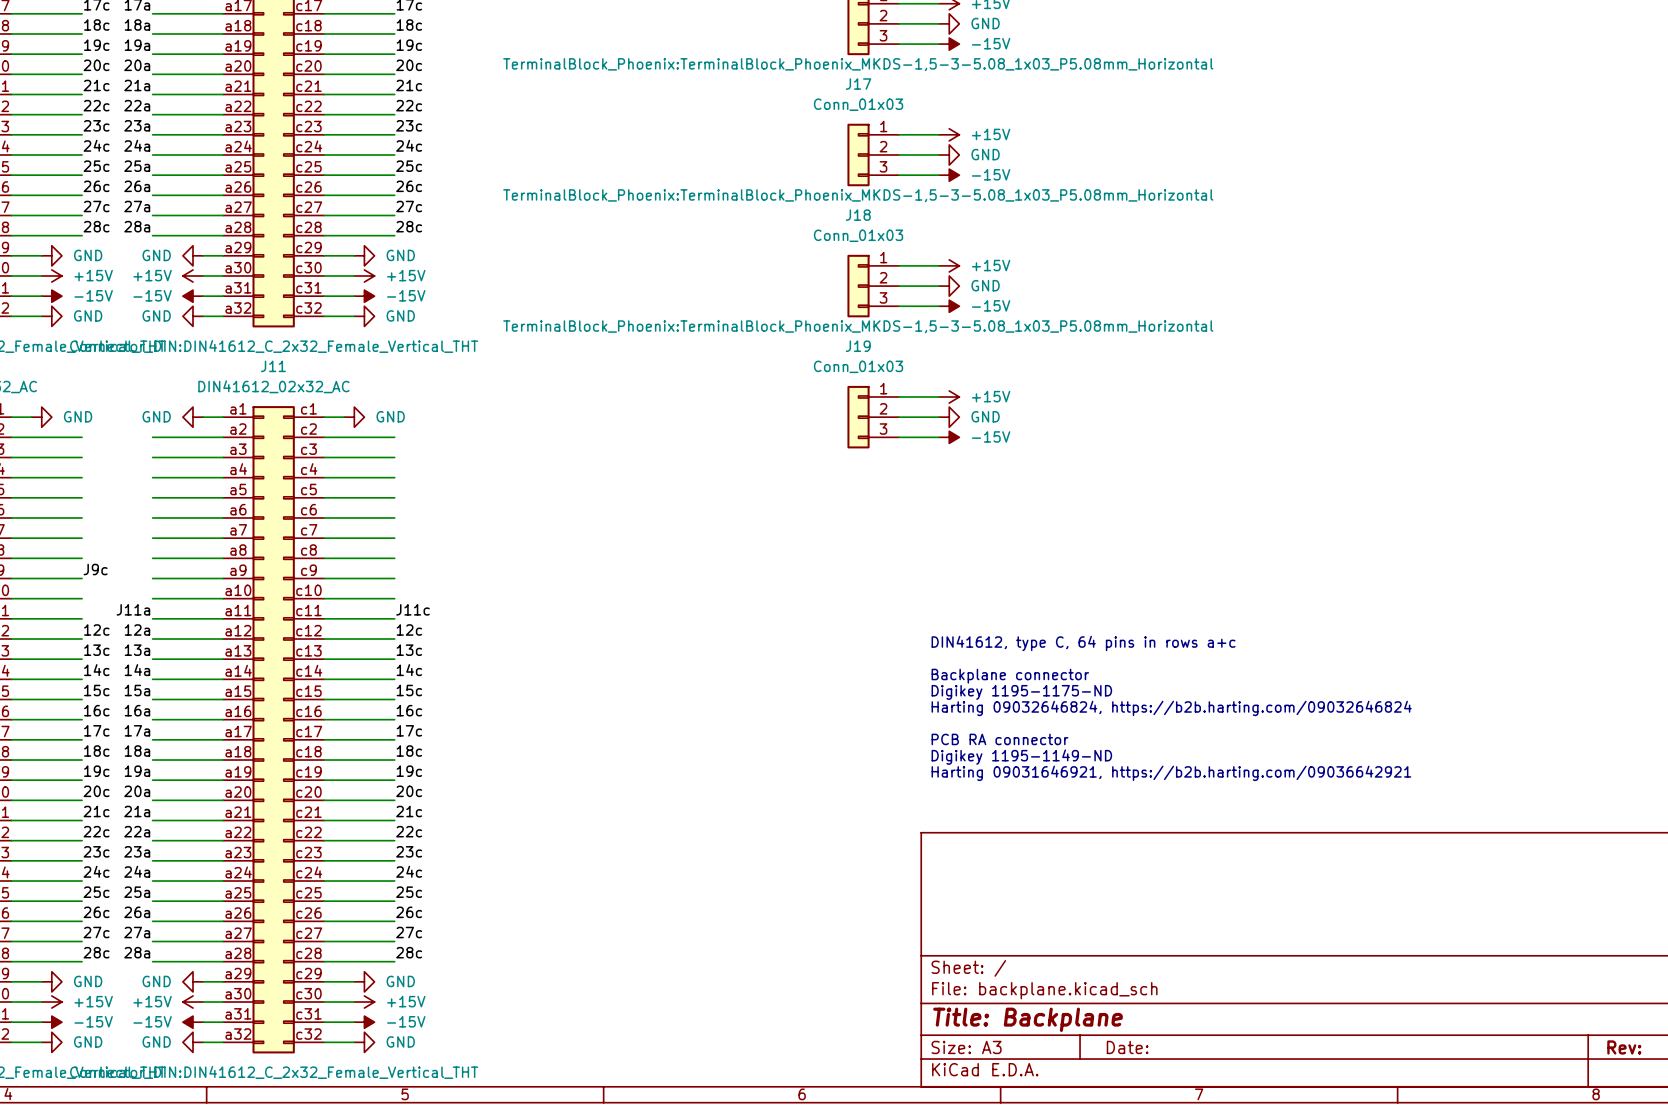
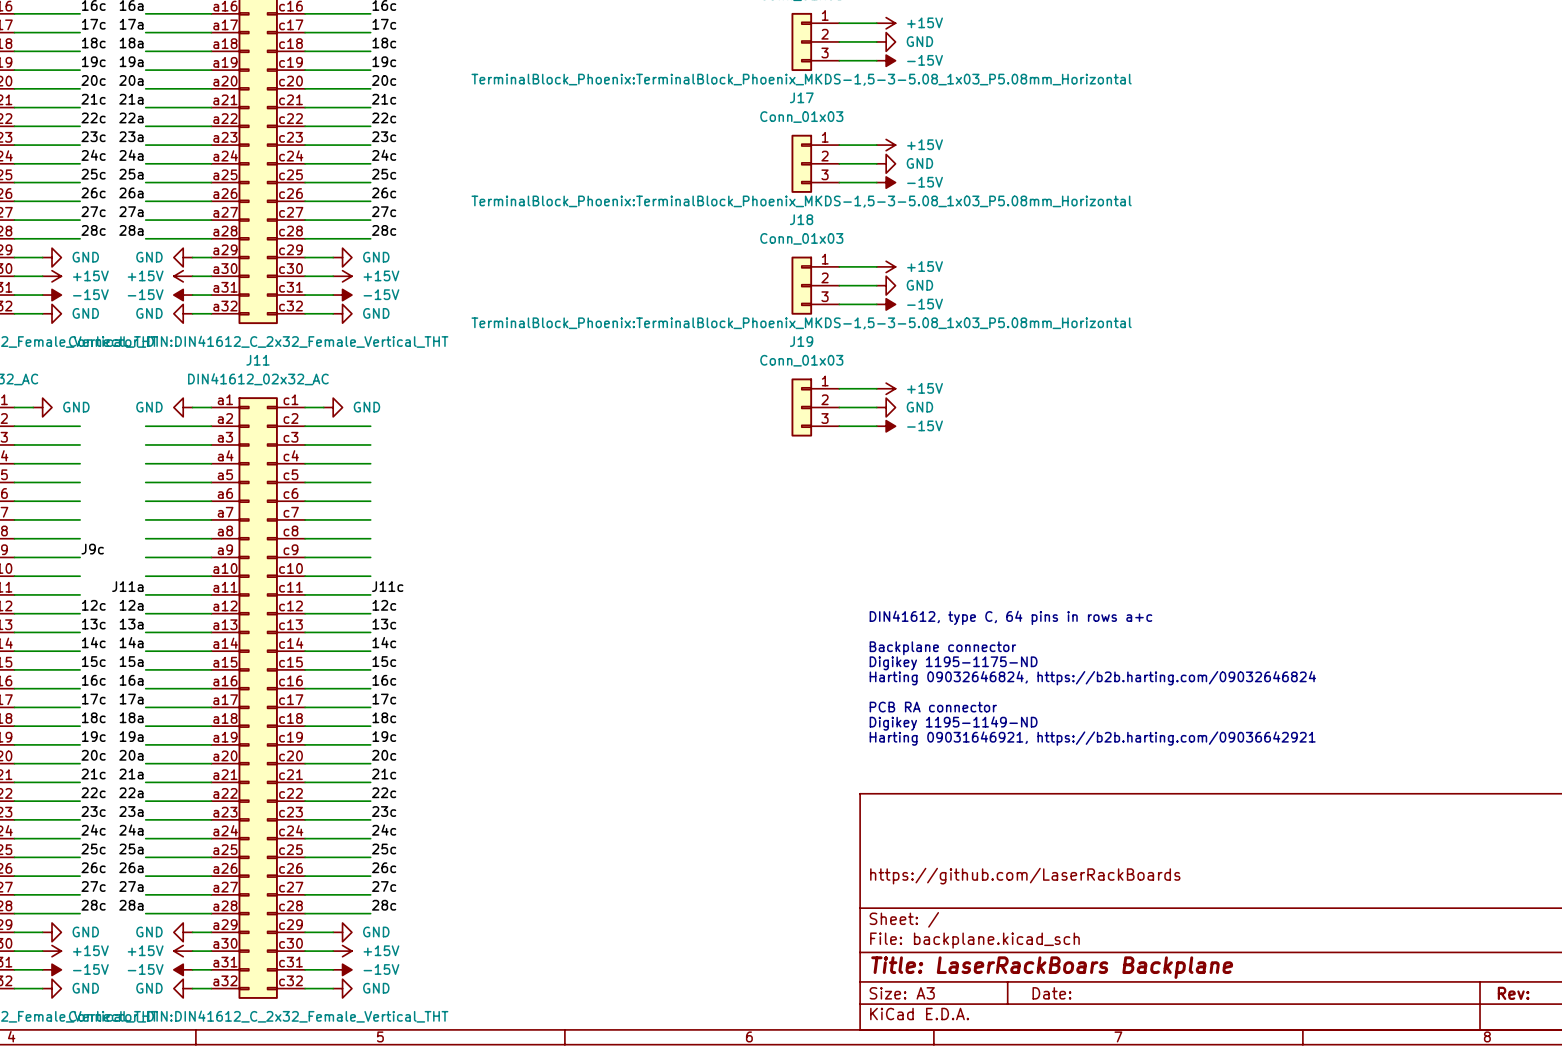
title block: none -> https://github.com/LaserRackBoards (1025, 876)
title block: Title: Backplane (1028, 1019) -> Title: LaserRackBoars Backplane (1052, 967)

